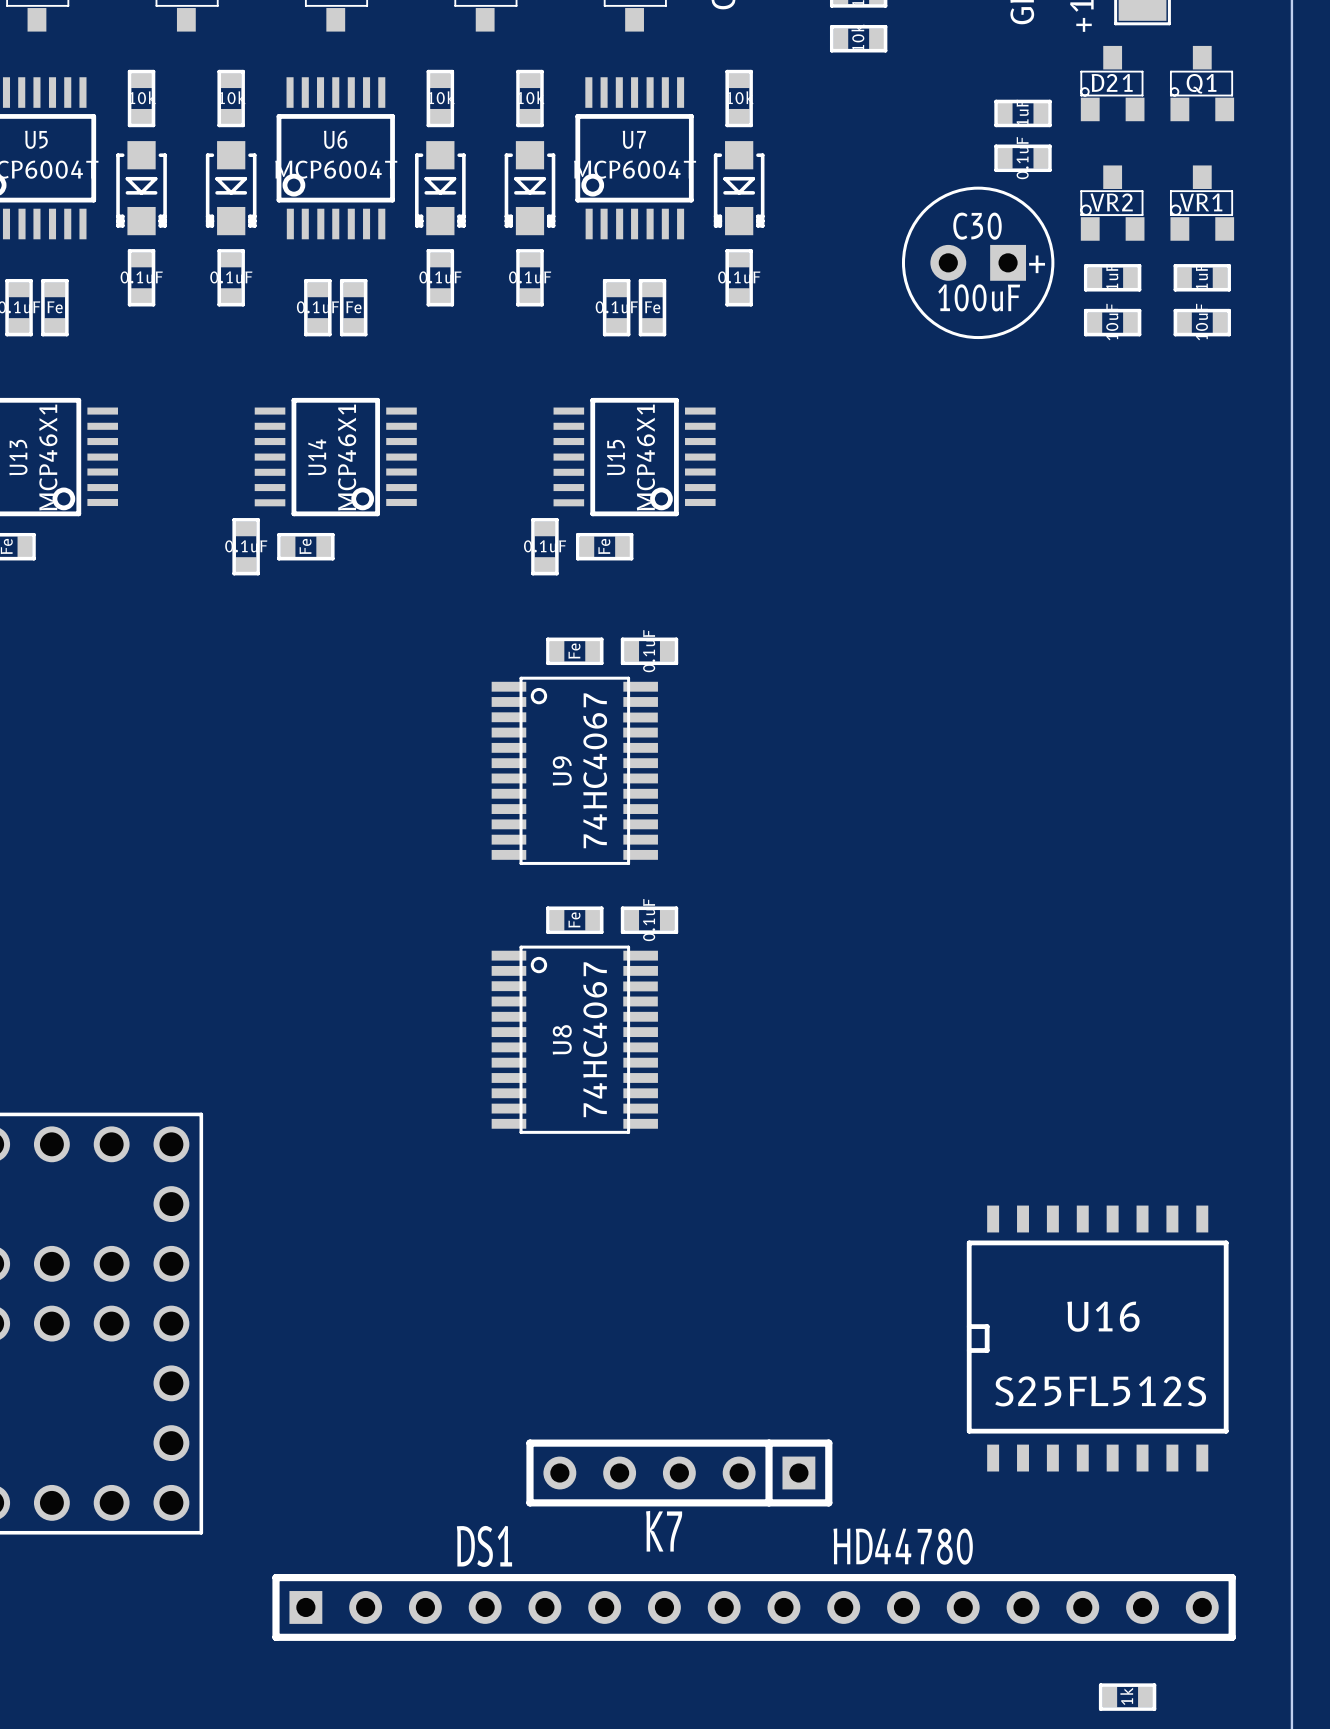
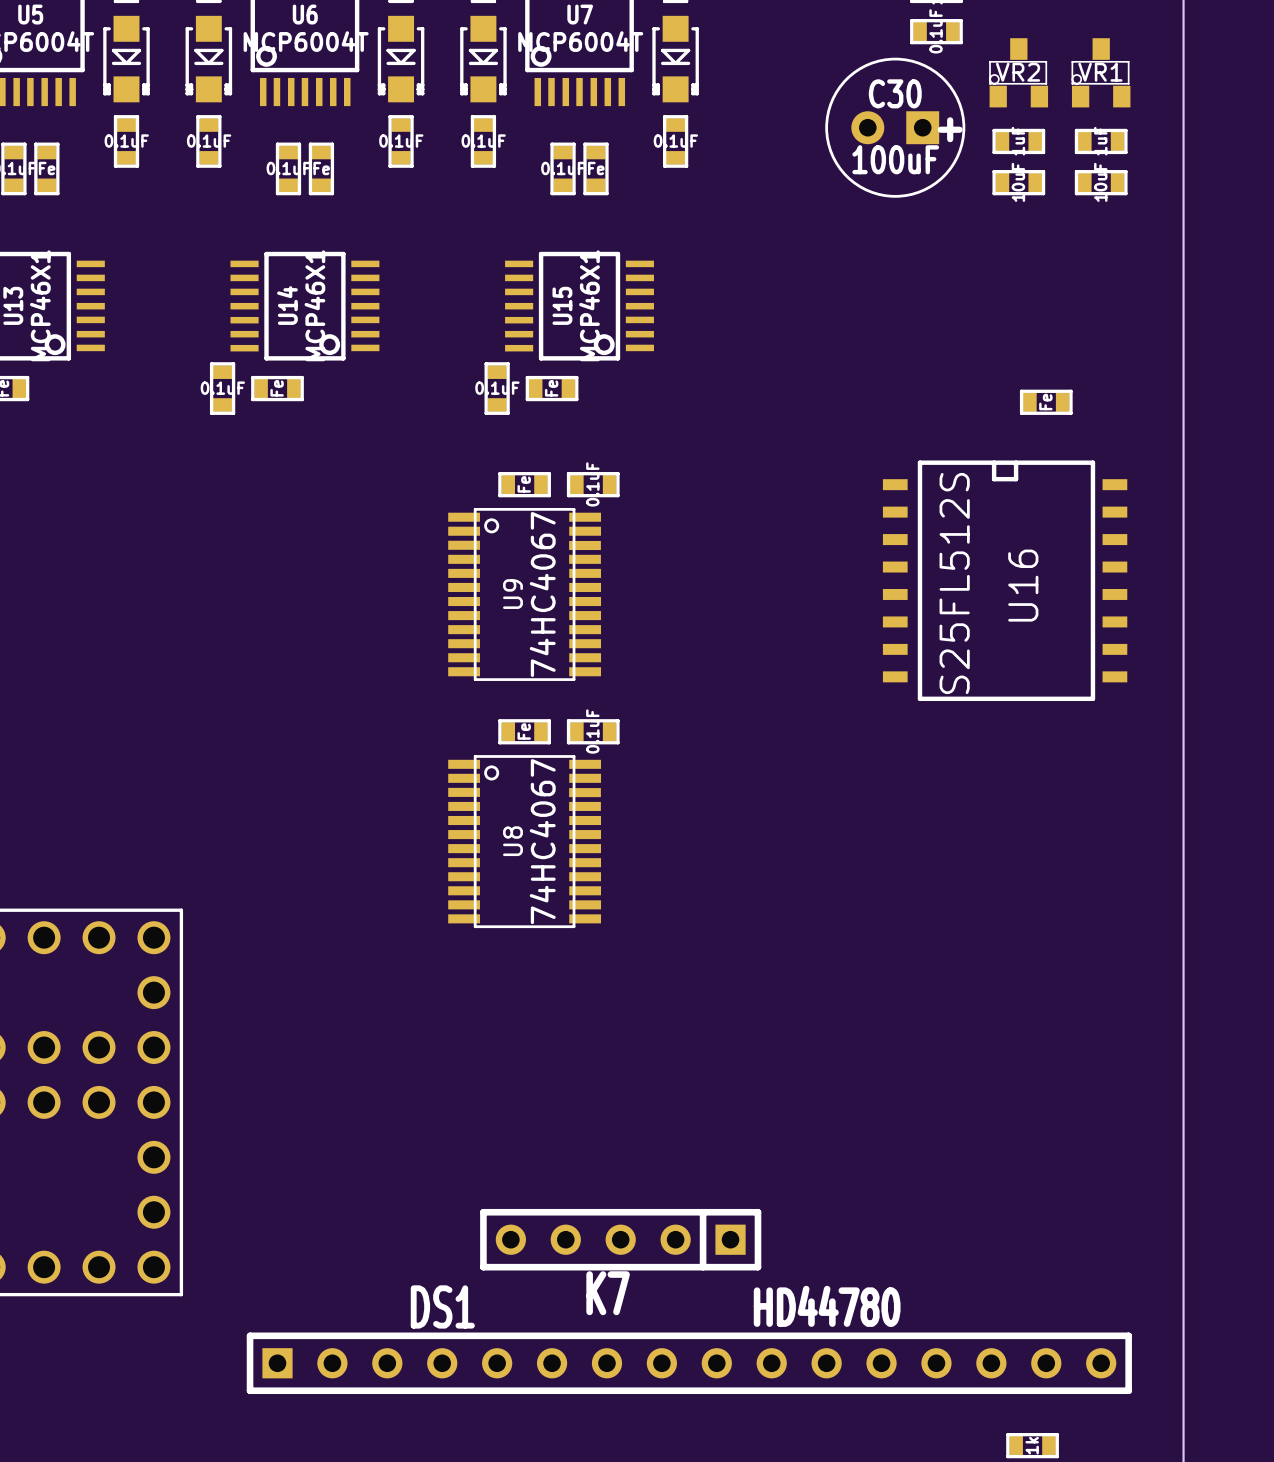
part: none -> Fe (1046, 402)
U16 rotation: 0° (1097, 1338) -> 90° clockwise (1005, 580)
U16 position: (1097, 1338) -> (1005, 580)

